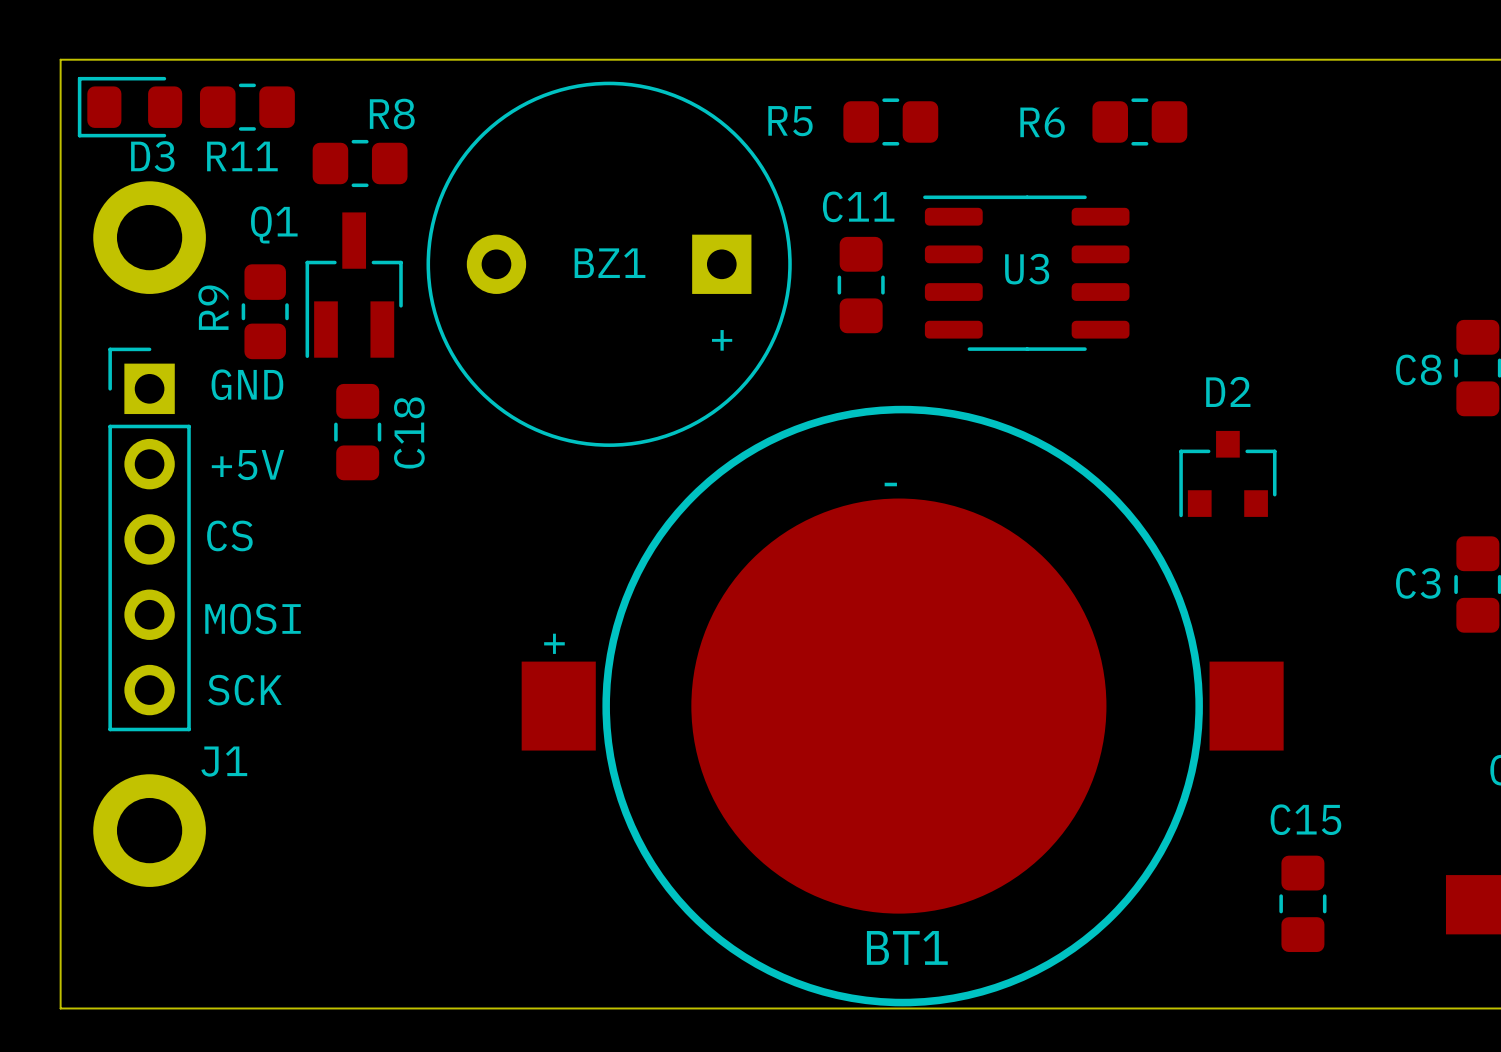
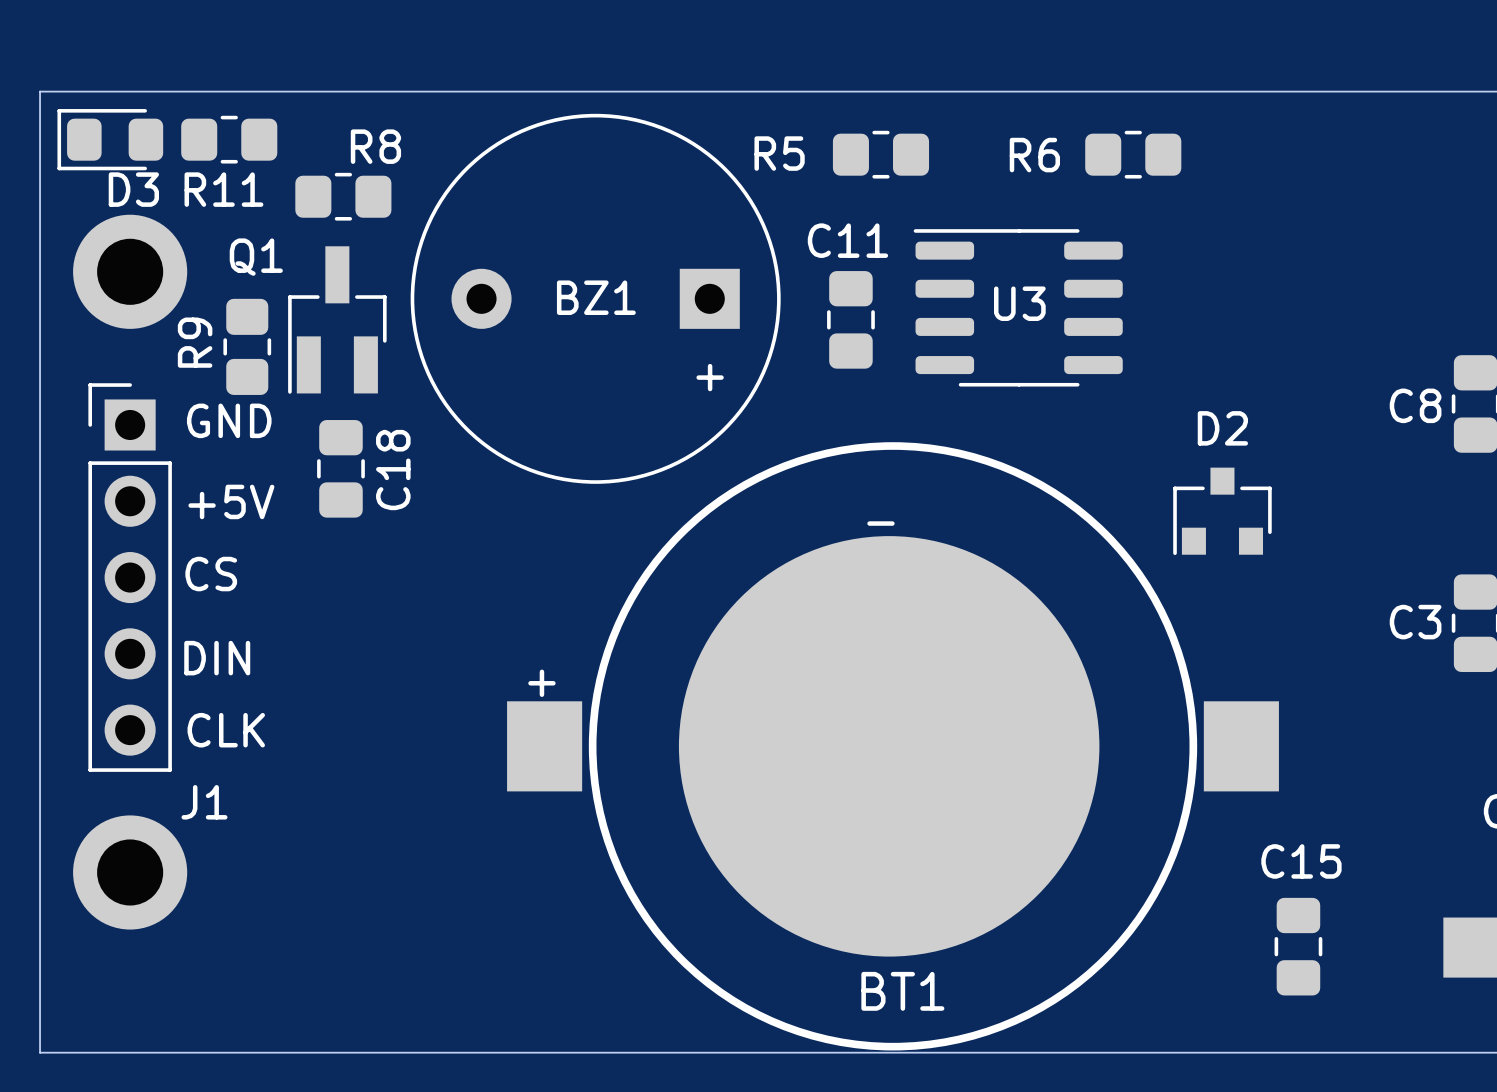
text: MOSI (253, 618) -> DIN (217, 658)
text: SCK (244, 690) -> CLK (226, 730)

